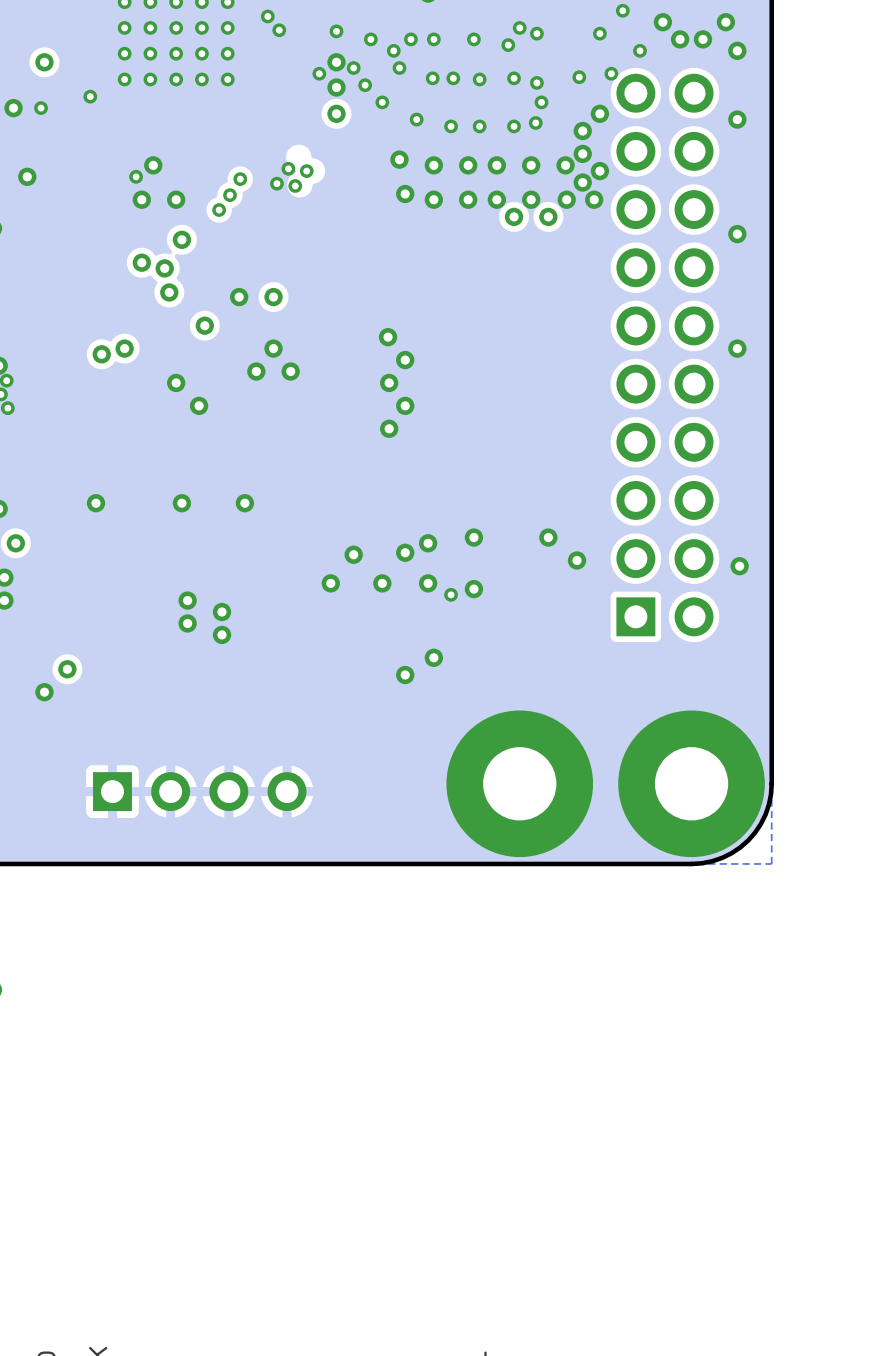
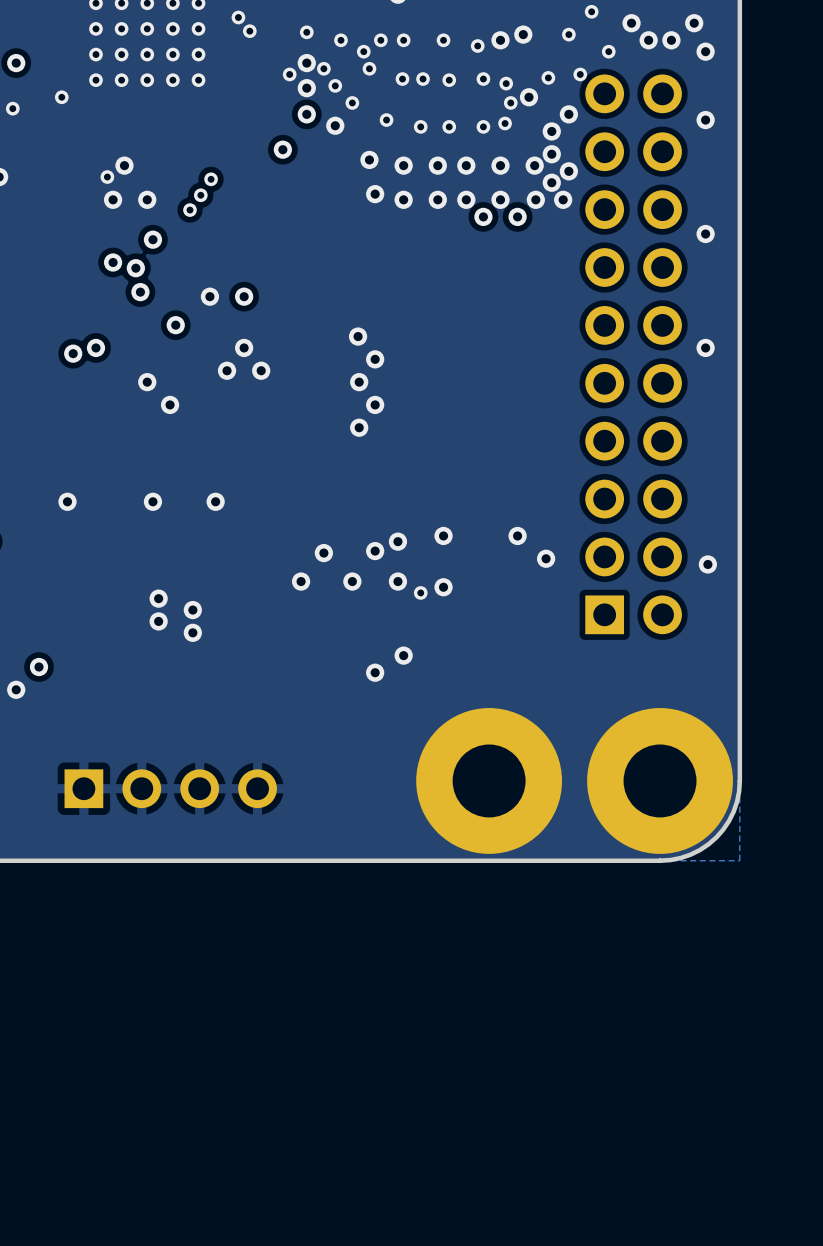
via: (519, 27) -> none
via: (536, 33) -> none
via: none -> (523, 34)
via: none -> (500, 40)
via: none -> (528, 97)
via: none -> (335, 125)
via: none -> (282, 149)
via: (288, 168) -> none
via: (306, 171) -> none
via: (276, 183) -> none
via: (295, 185) -> none

